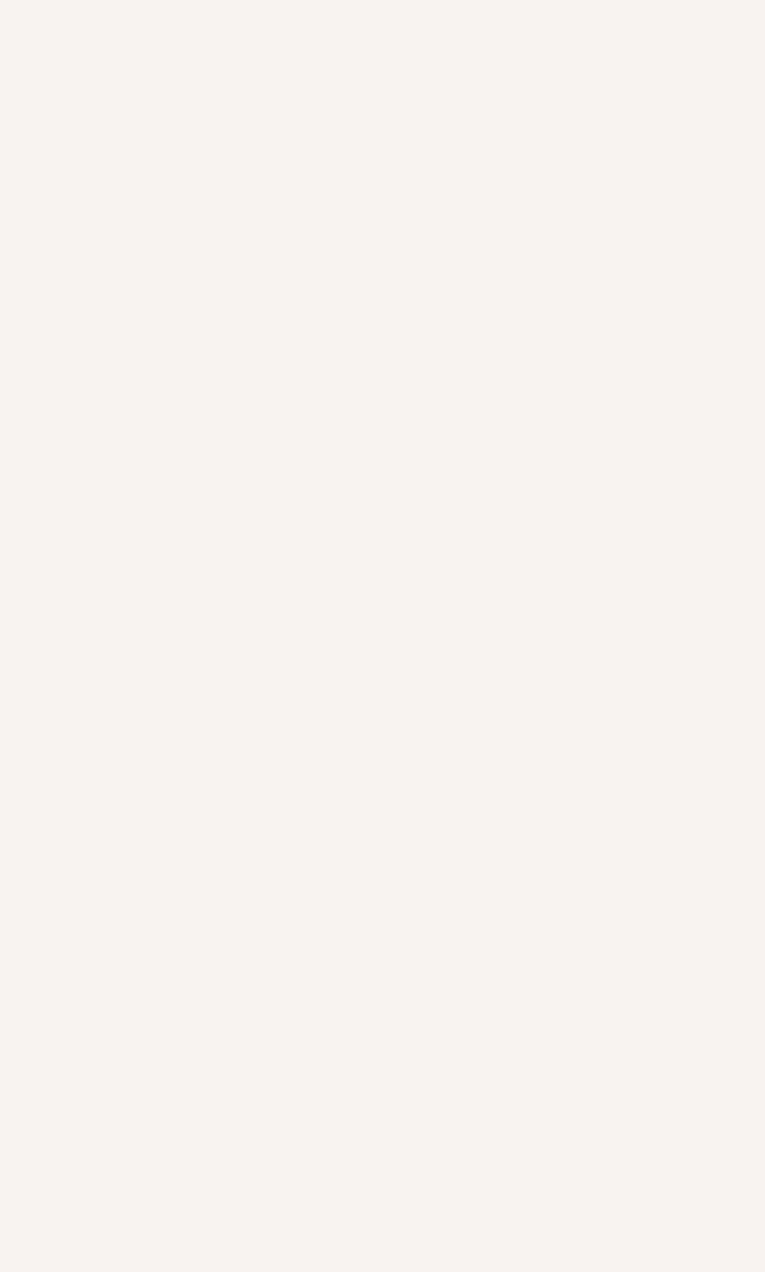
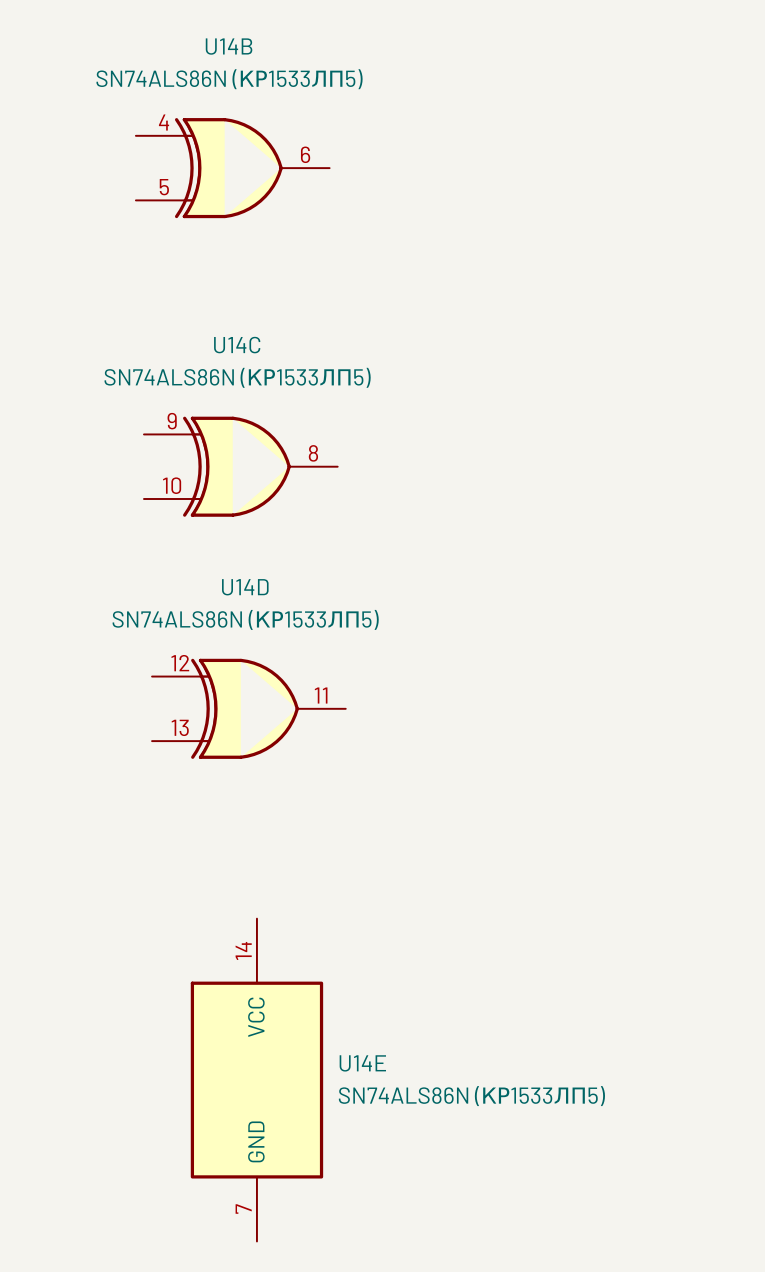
U14B: none -> SN74ALS86N (КР1533ЛП5) (232, 168)
U14C: none -> SN74ALS86N (КР1533ЛП5) (240, 466)
U14D: none -> SN74ALS86N (КР1533ЛП5) (248, 708)
U14E: none -> SN74ALS86N (КР1533ЛП5) (256, 1080)

